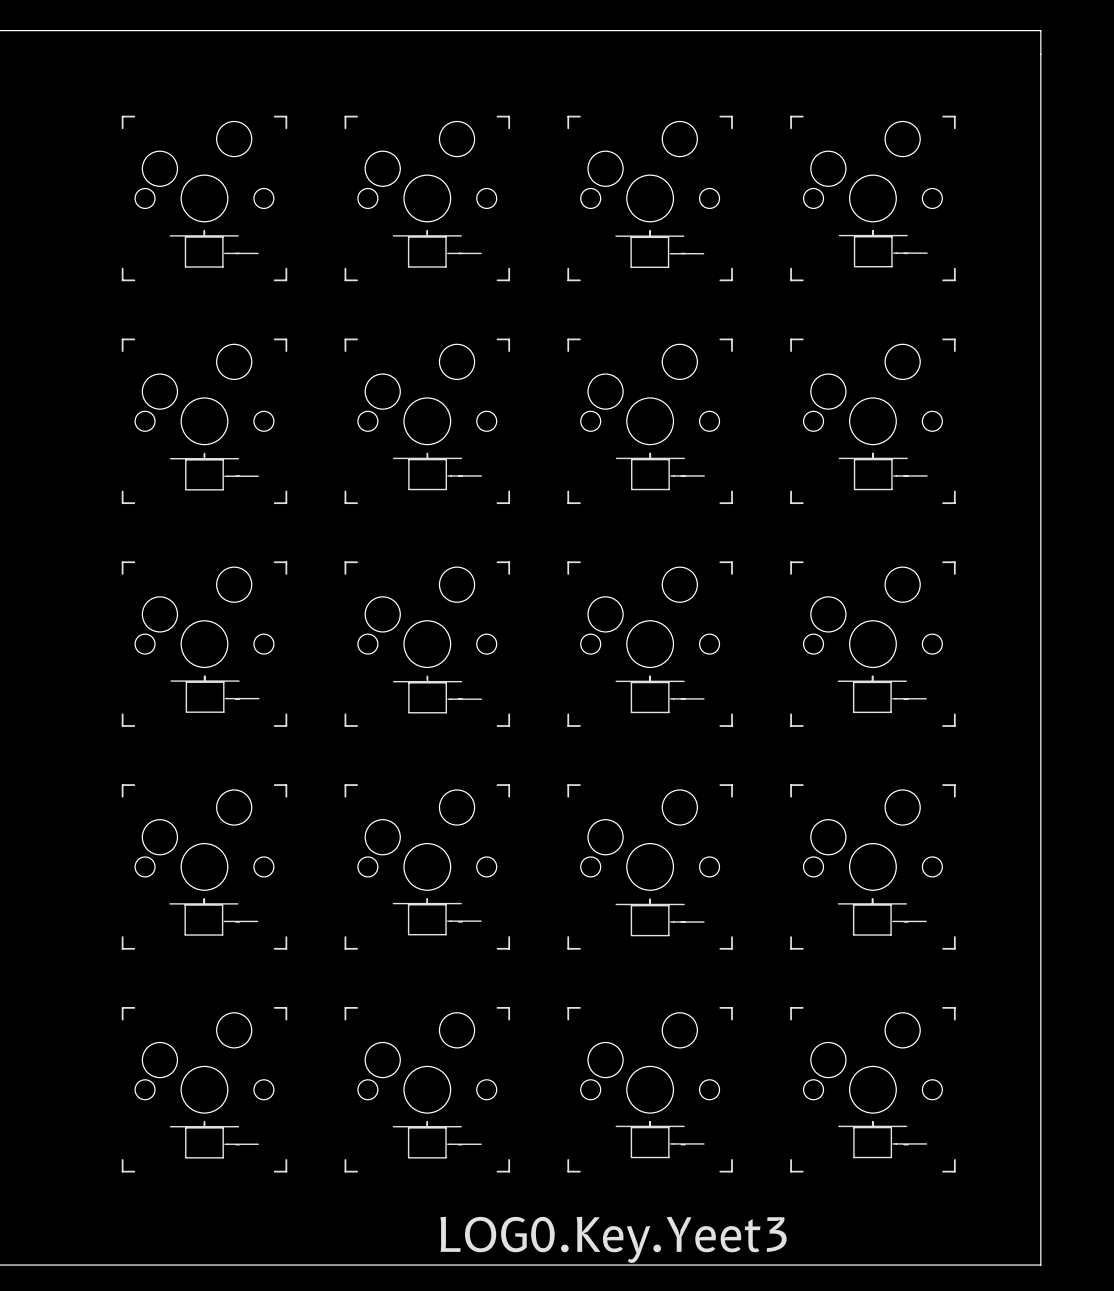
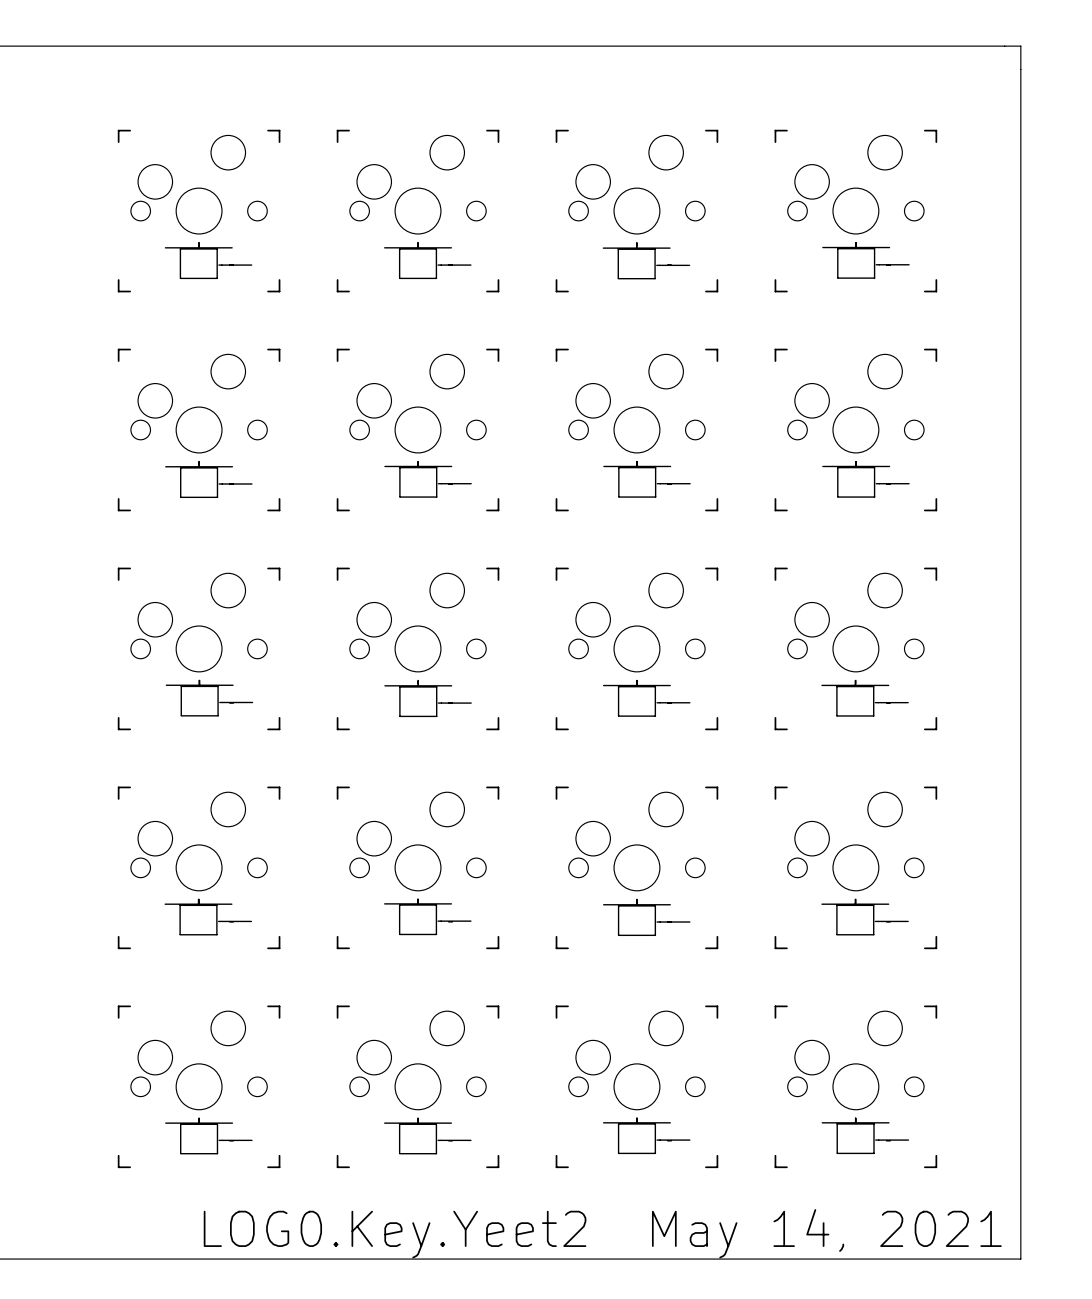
text: LOG0.Key.Yeet3 (613, 1239) -> LOG0.Key.Yeet2 May 14, 2021 (602, 1233)

